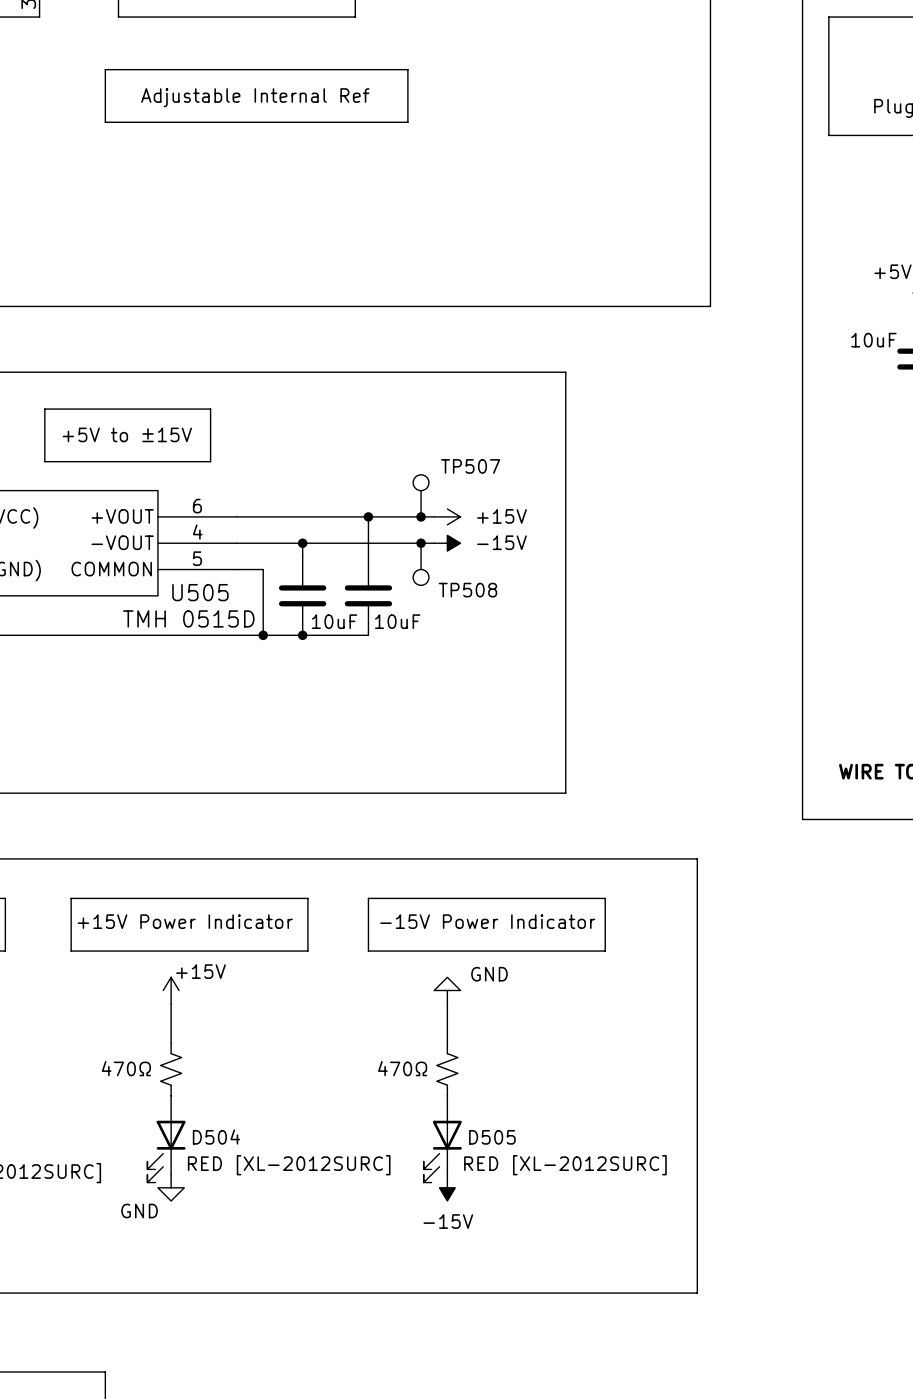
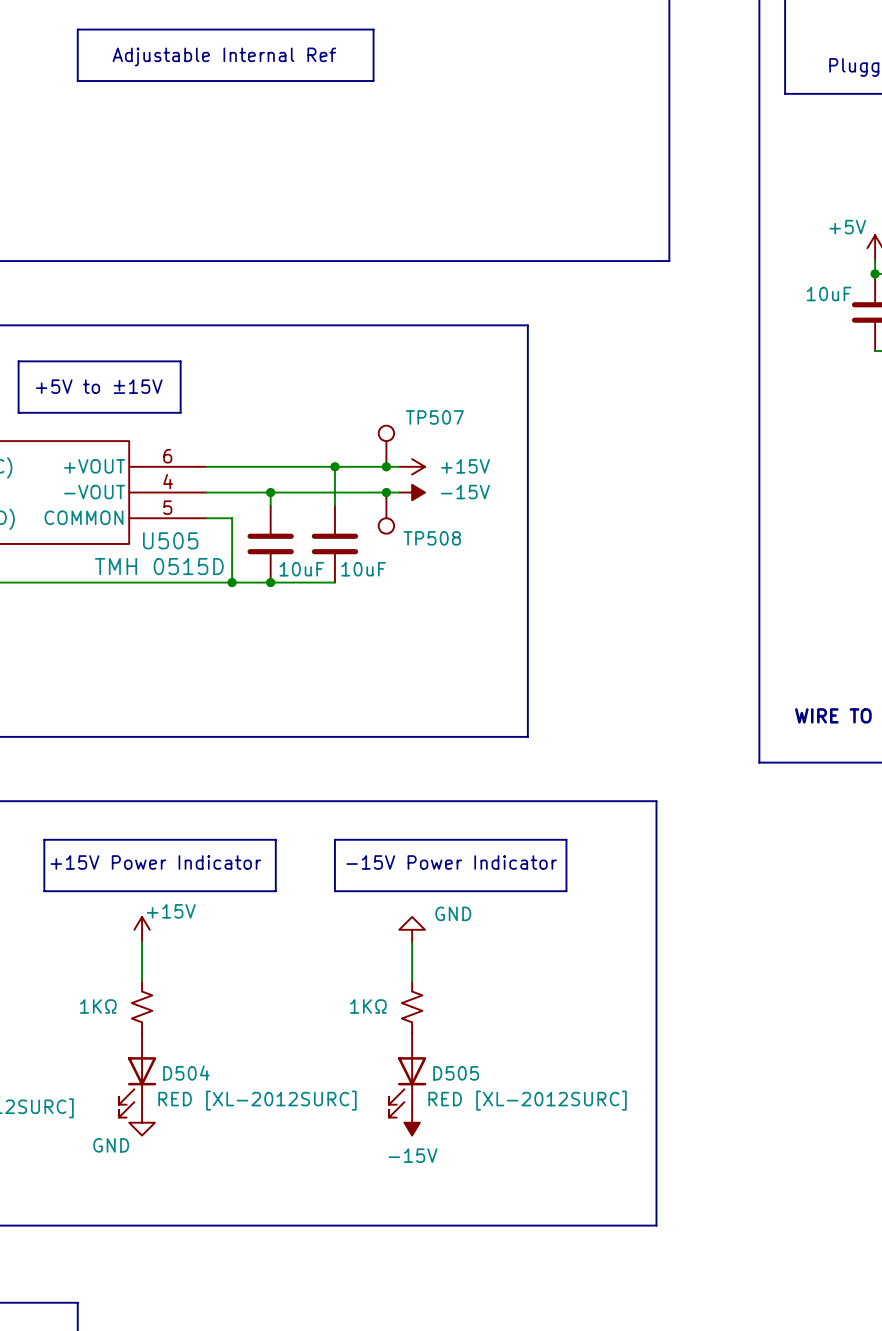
part value: 470Ω (126, 1068) -> 1KΩ (98, 1006)
part value: 470Ω (402, 1068) -> 1KΩ (368, 1006)

